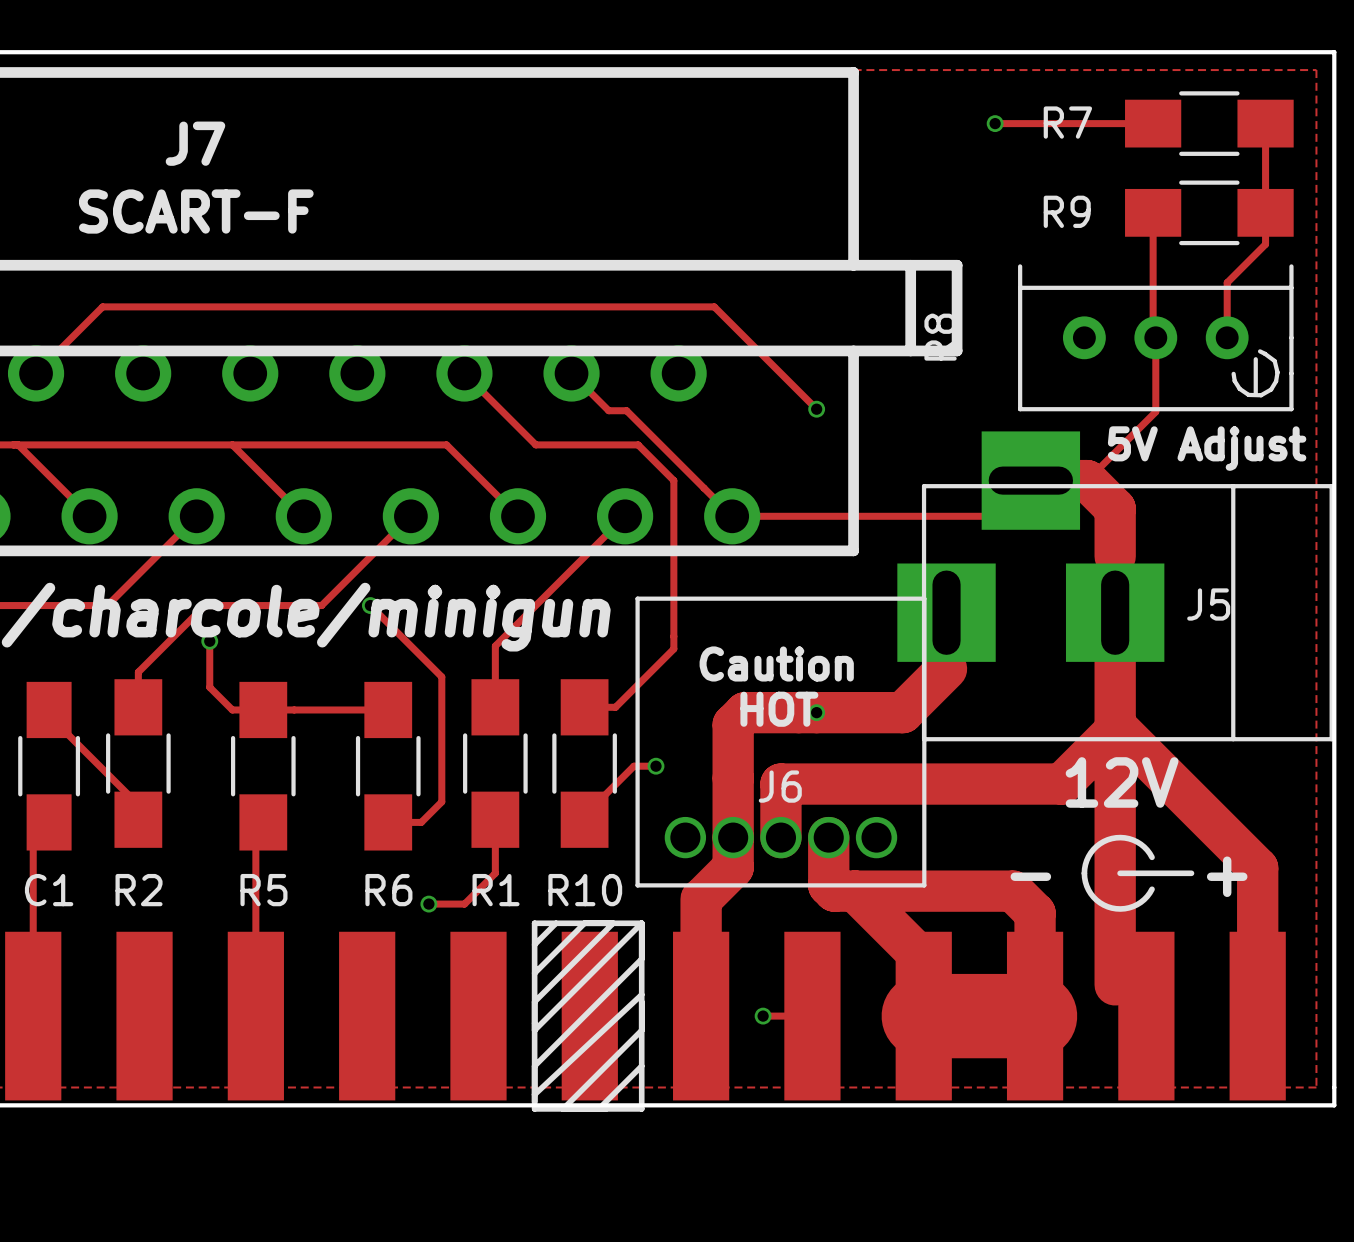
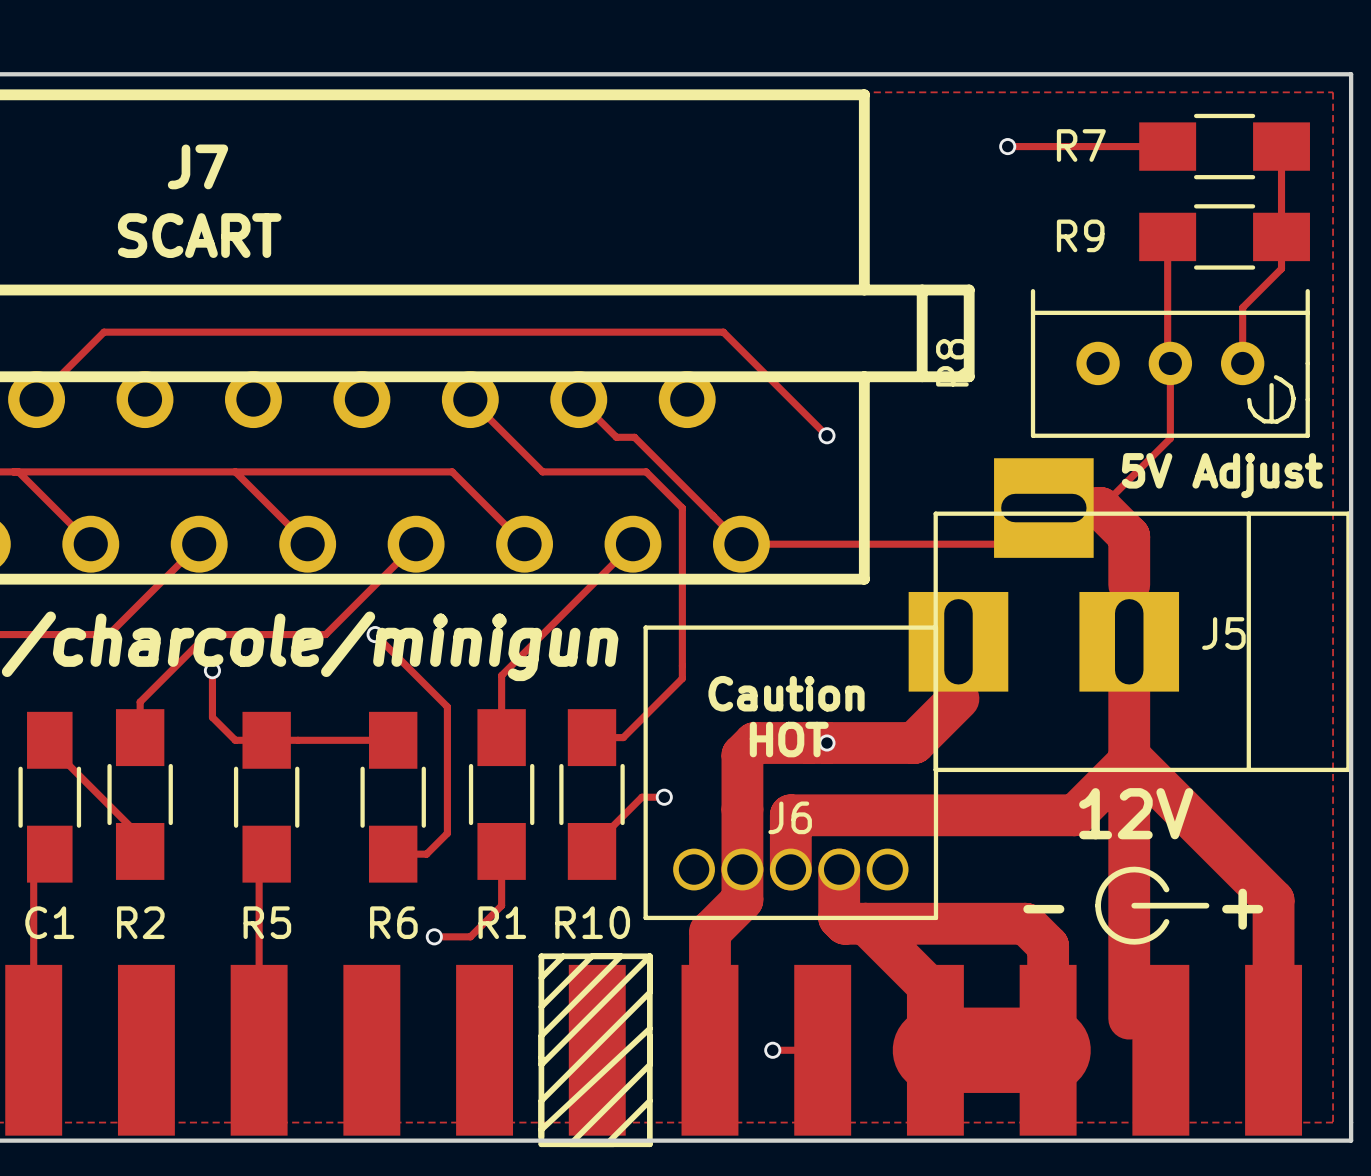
J7 value: SCART-F (196, 211) -> SCART (199, 235)

